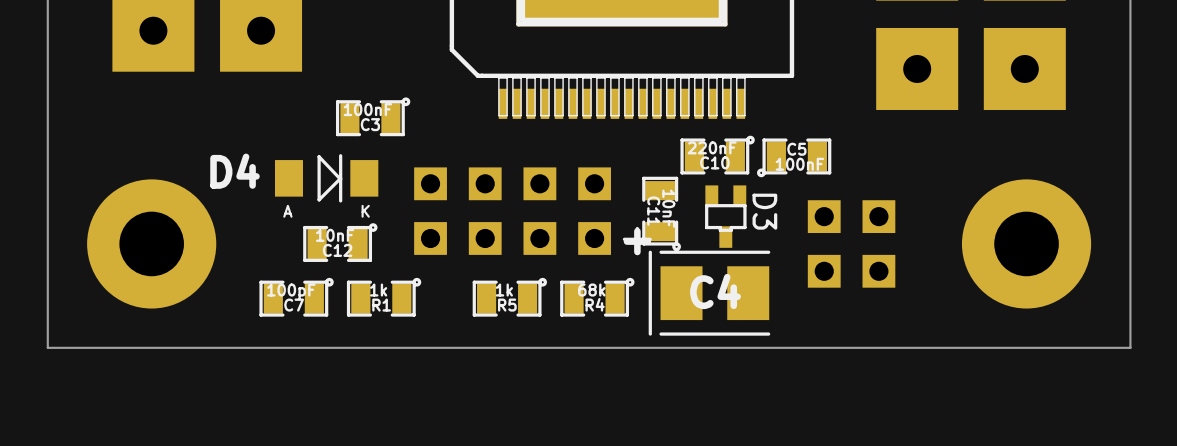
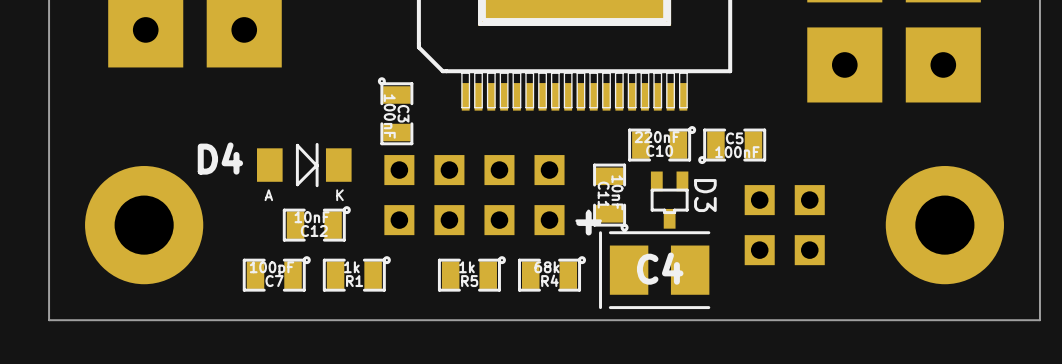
C3 rotation: 0° (373, 116) -> 90° counterclockwise (395, 111)
C3 position: (373, 116) -> (395, 111)

